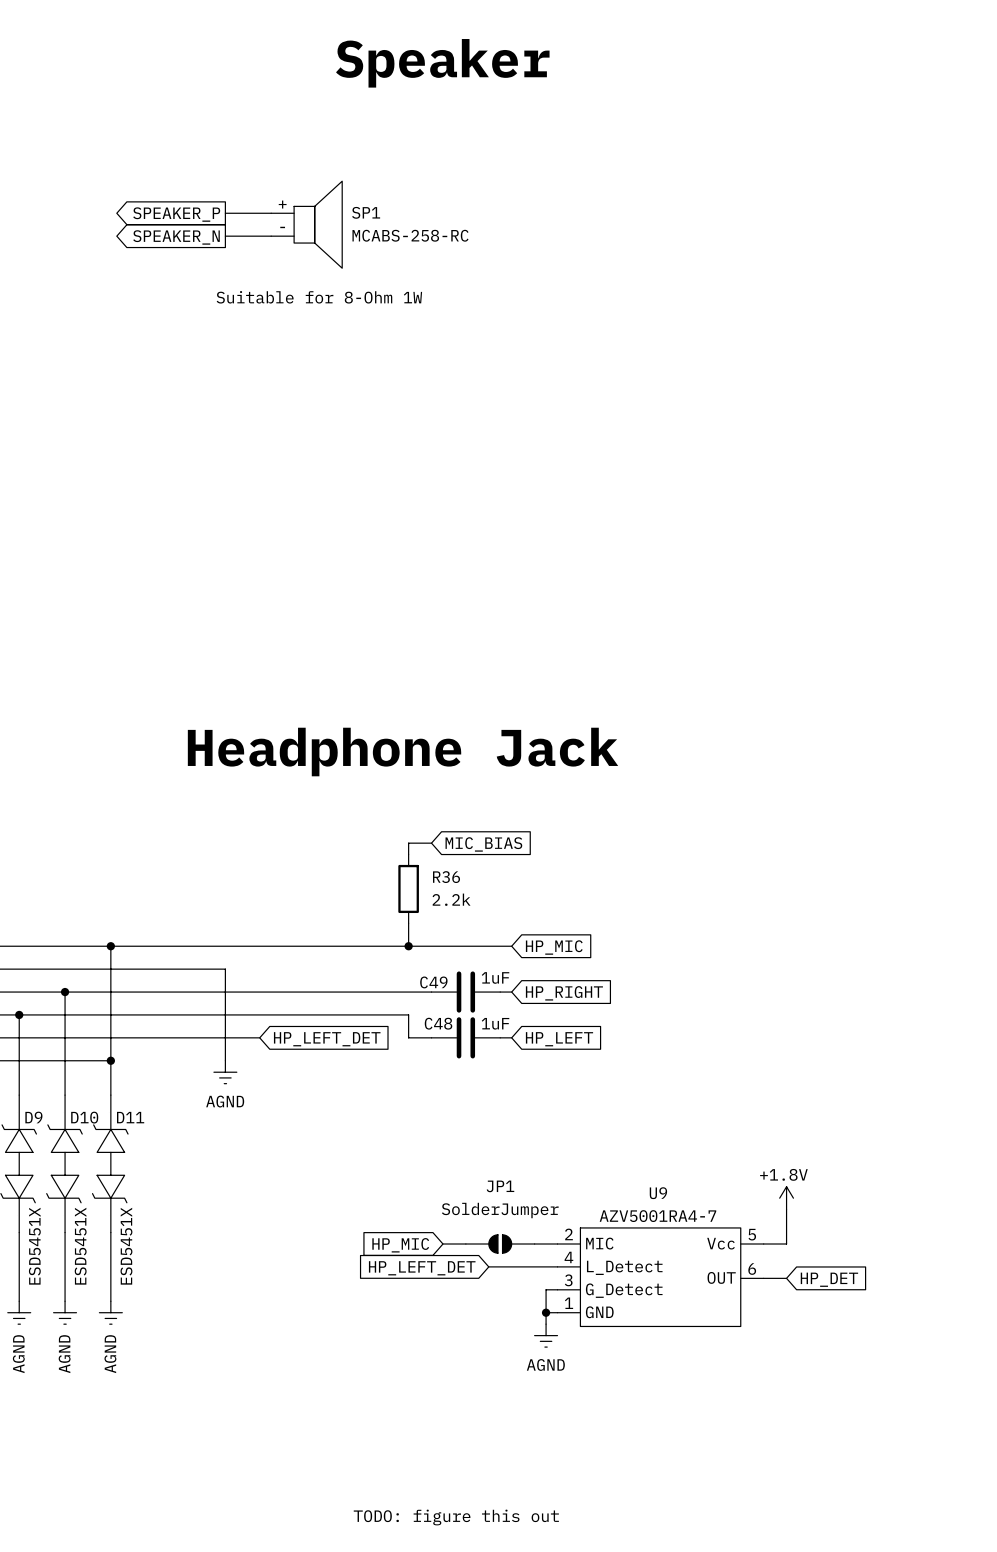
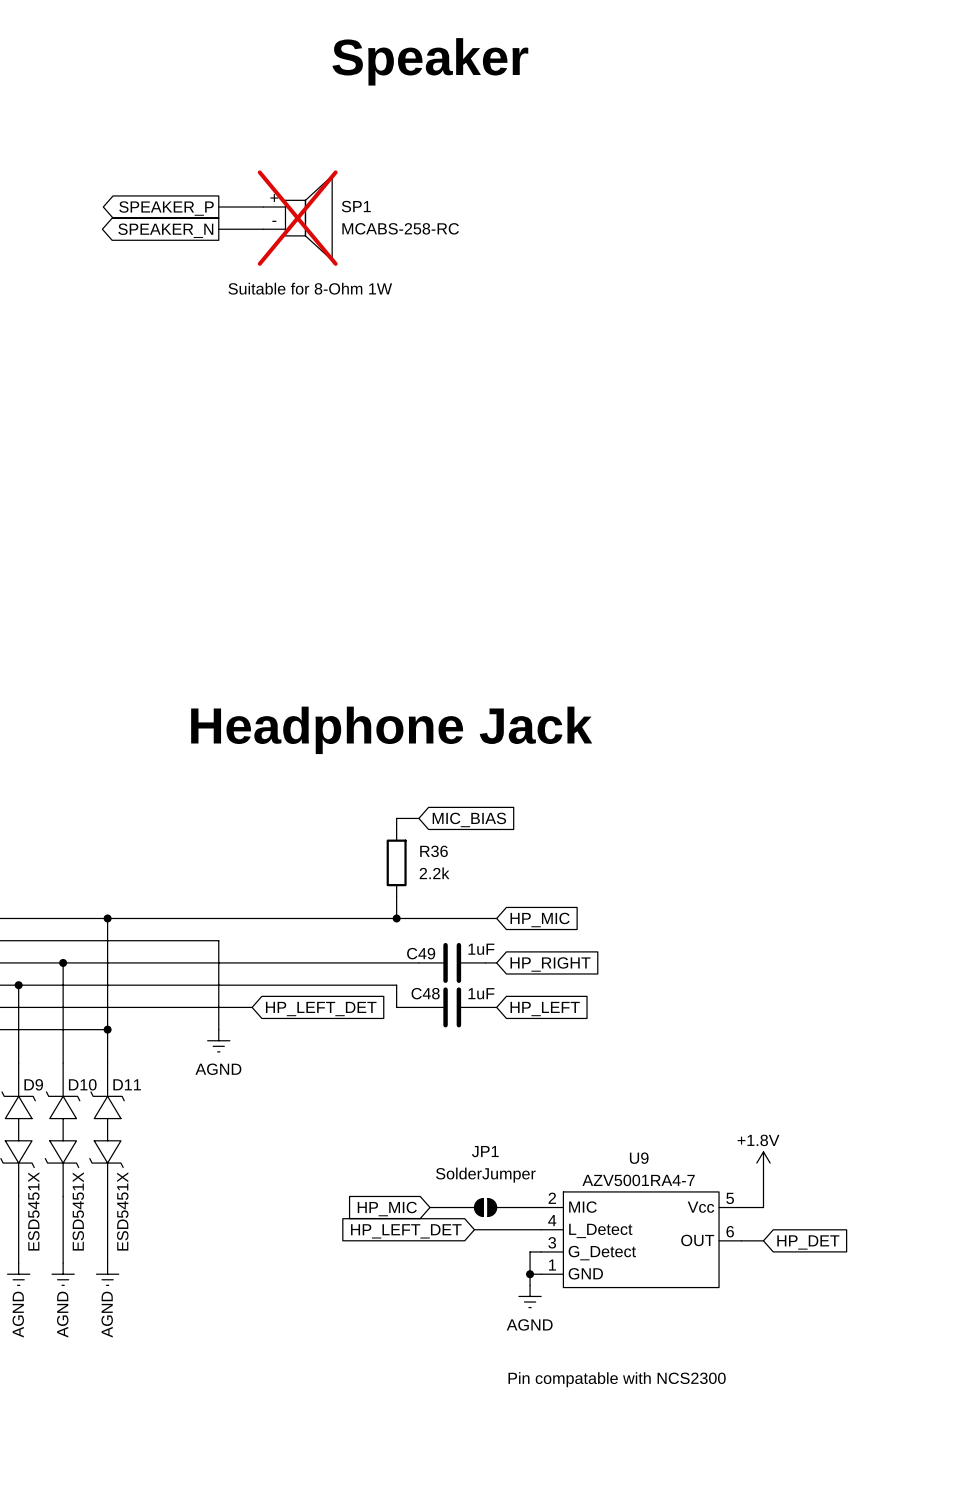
SP1 do-not-place cross: none -> (297, 218)
text: none -> Pin compatable with NCS2300 (617, 1379)
text: TODO: figure this out (456, 1517) -> none

